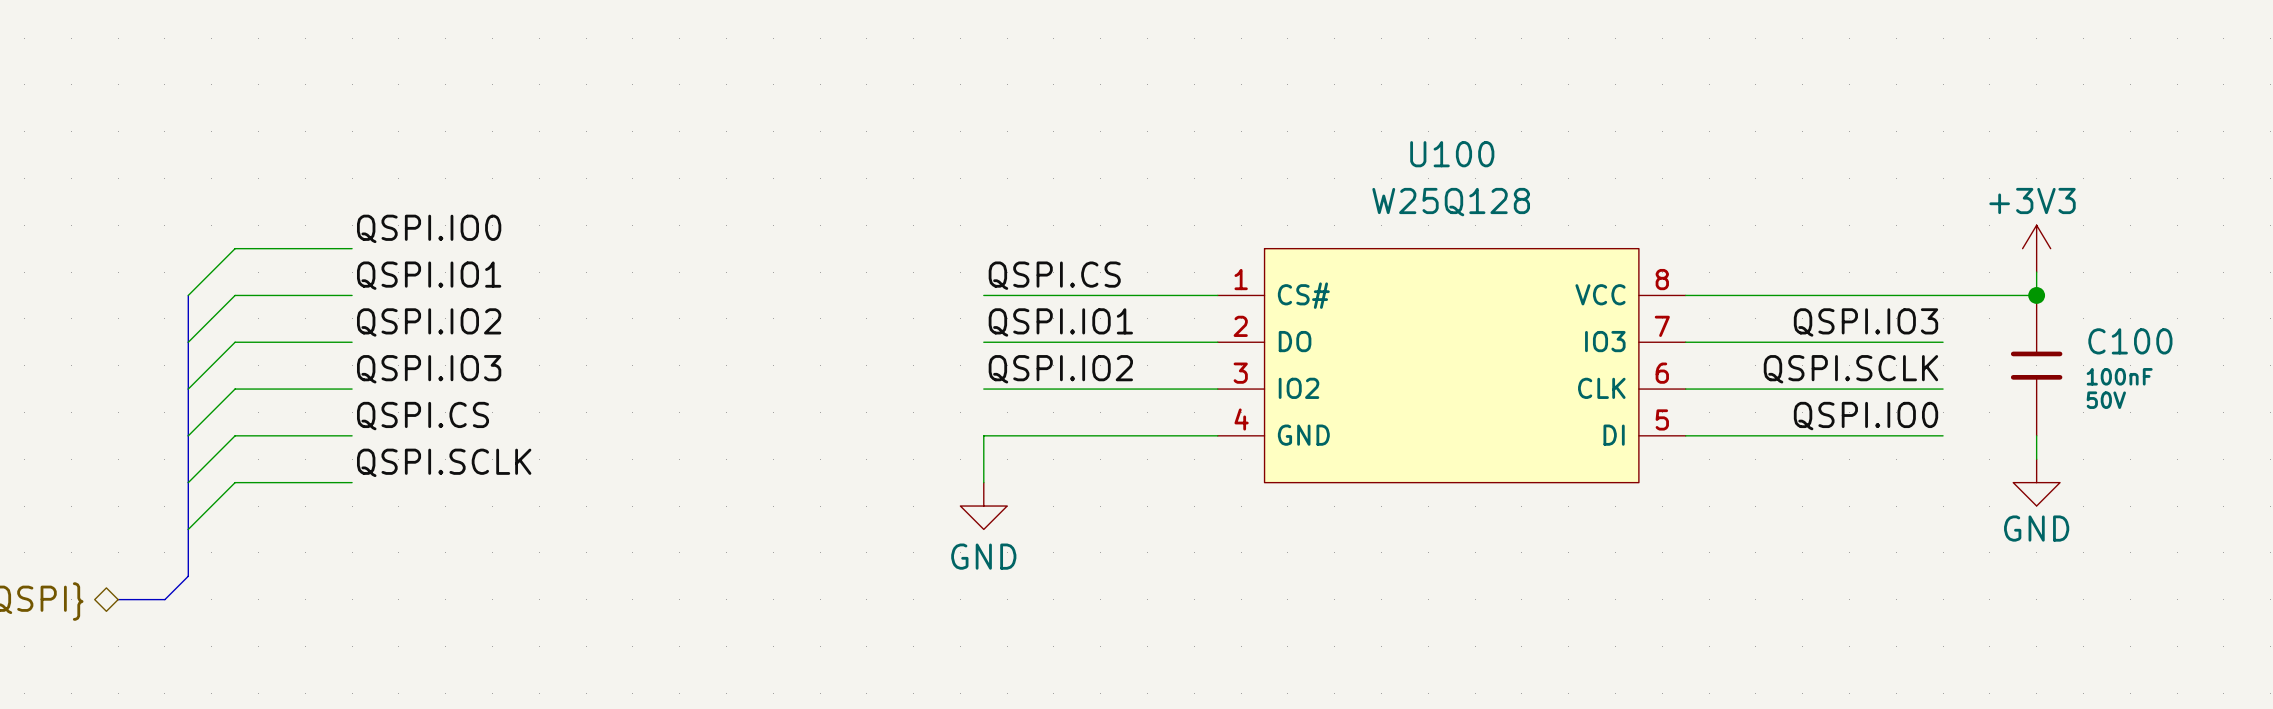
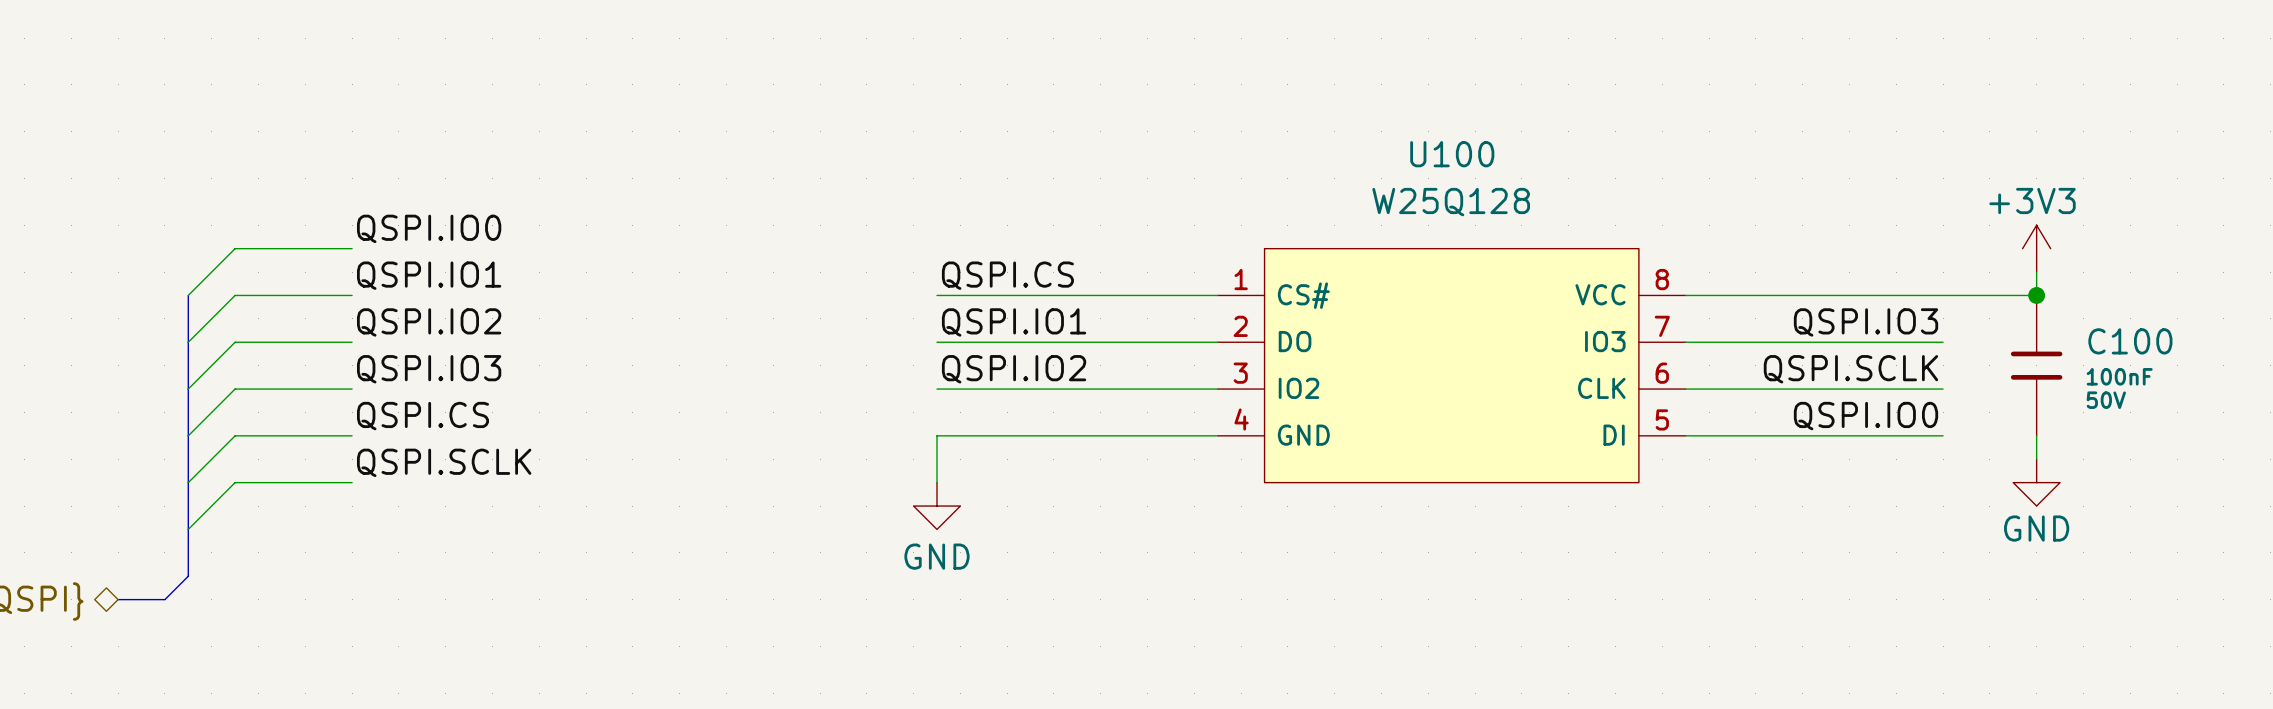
label position: QSPI.CS (1054, 275) -> QSPI.CS (1007, 275)
wire: none -> (936, 295) (983, 295)
label position: QSPI.IO1 (1060, 322) -> QSPI.IO1 (1014, 322)
wire: none -> (936, 342) (983, 342)
label position: QSPI.IO2 (1060, 369) -> QSPI.IO2 (1014, 369)
wire: none -> (936, 389) (983, 389)
wire: (983, 435) (983, 482) -> (983, 435) (936, 435) (936, 482)
power symbol position: GND (983, 506) -> GND (936, 506)

